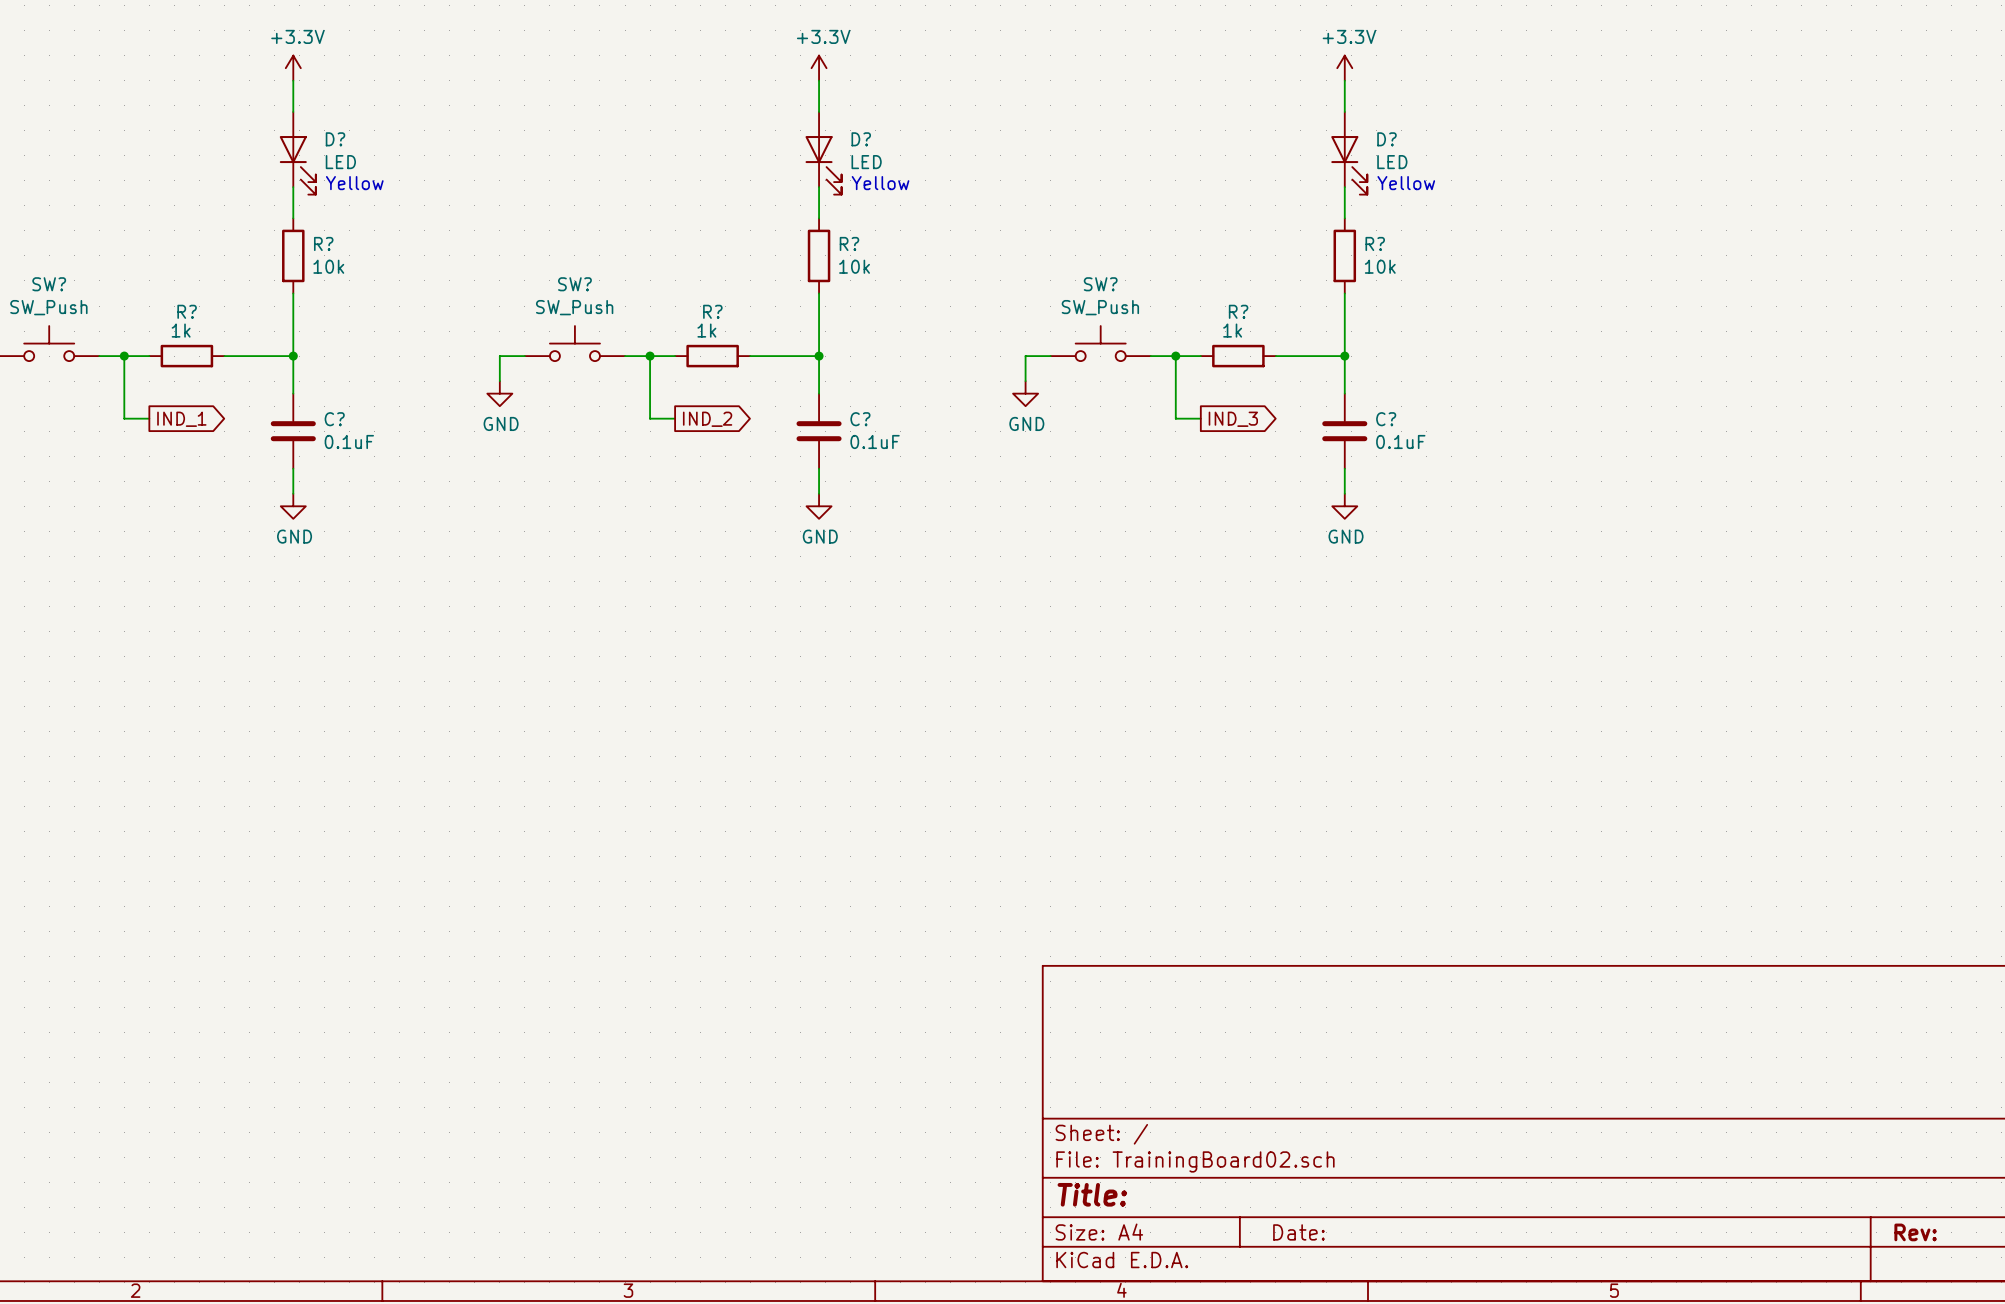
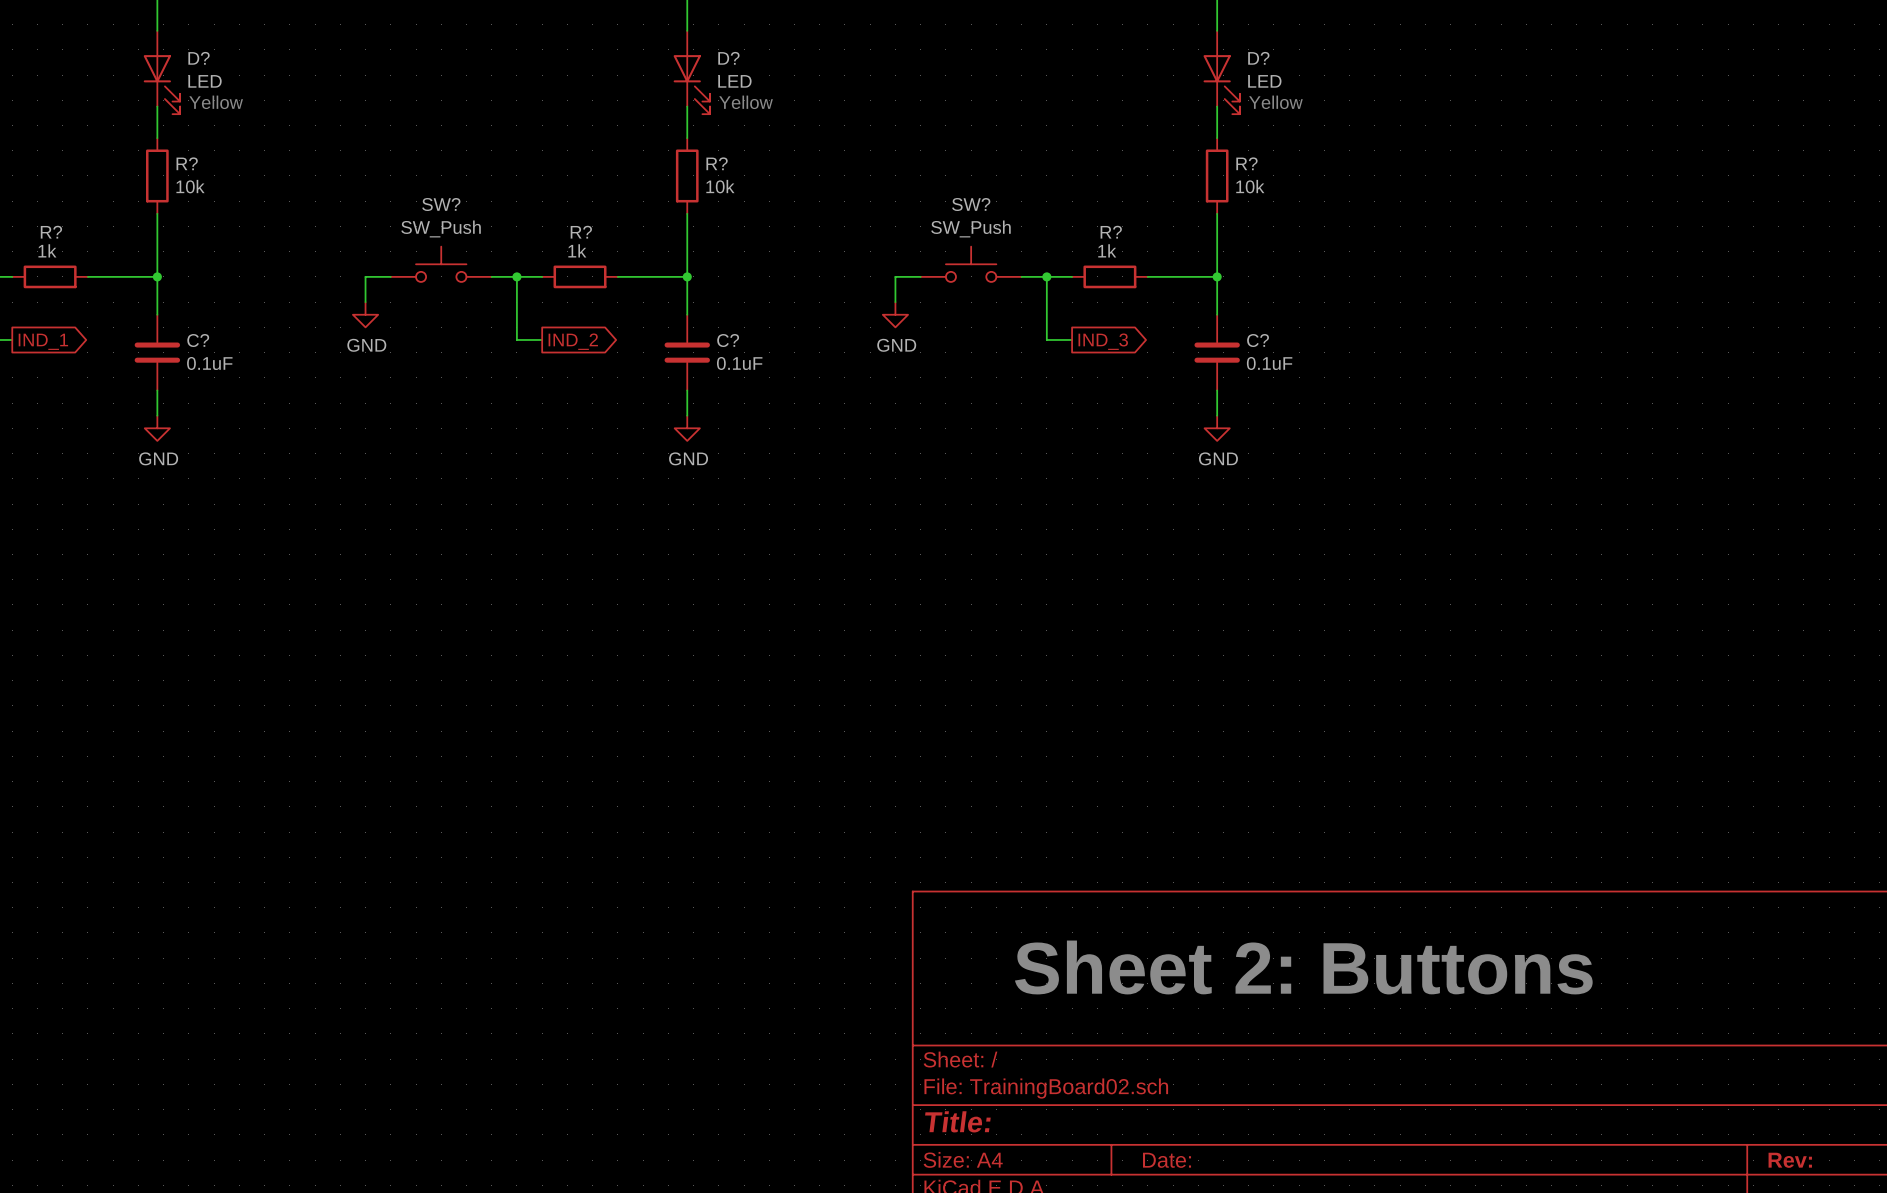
text: none -> Sheet 2: Buttons (1303, 967)

